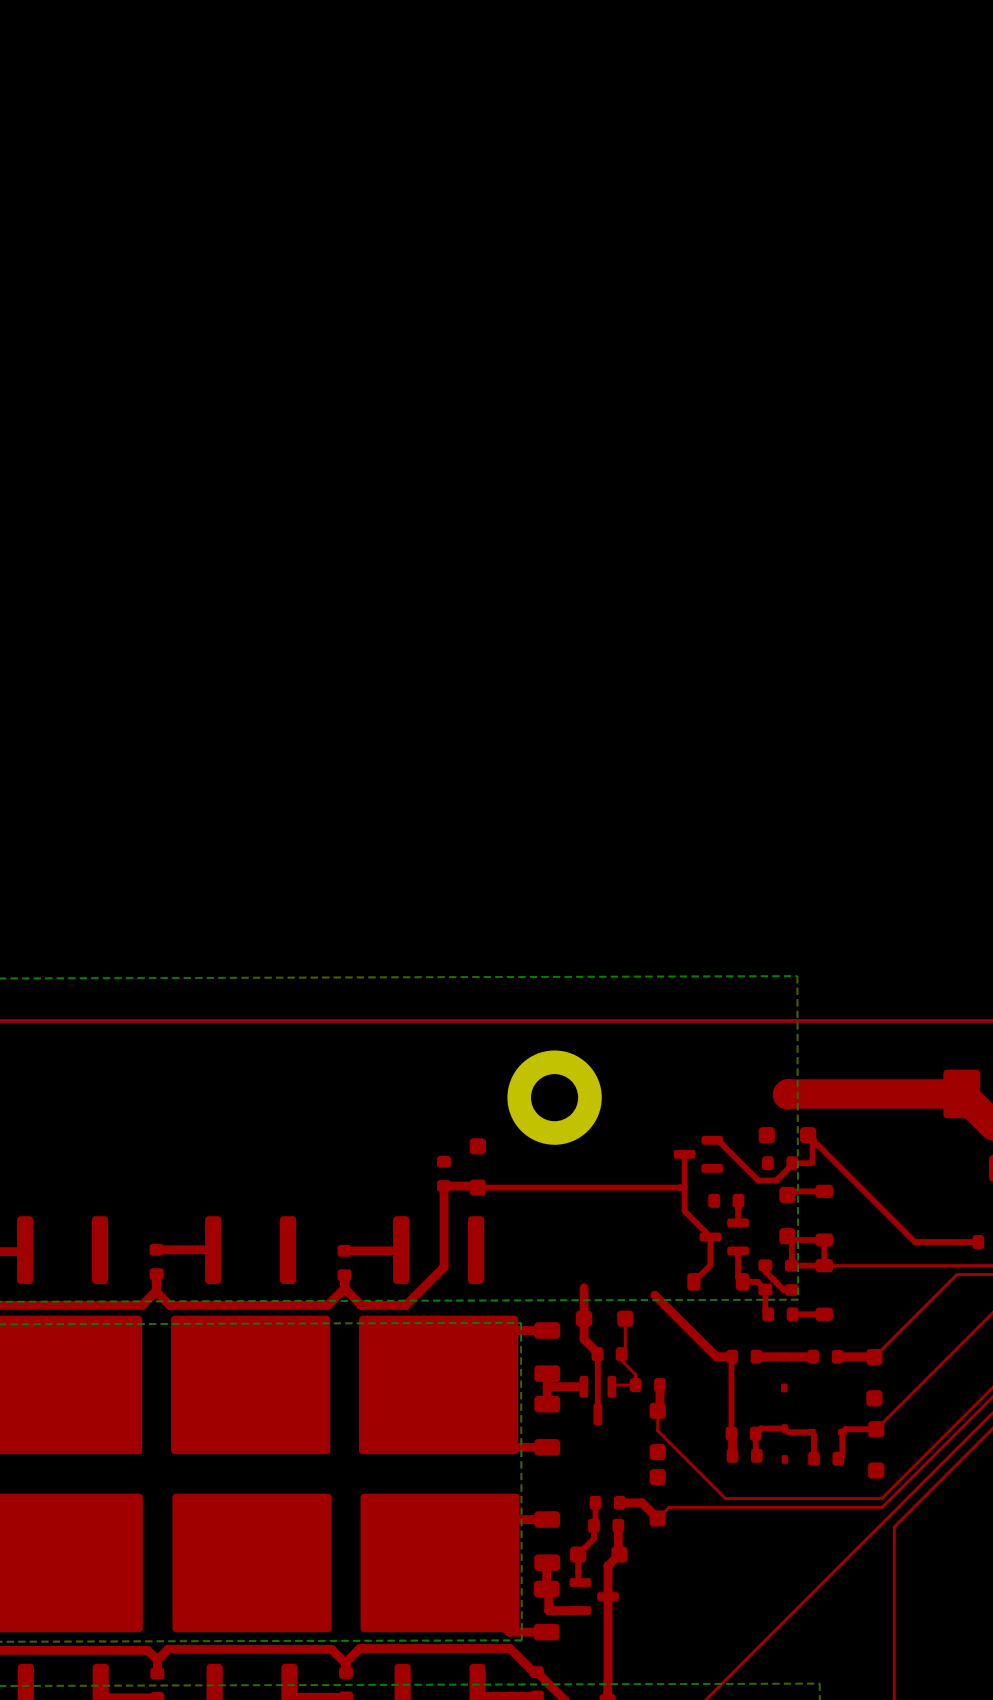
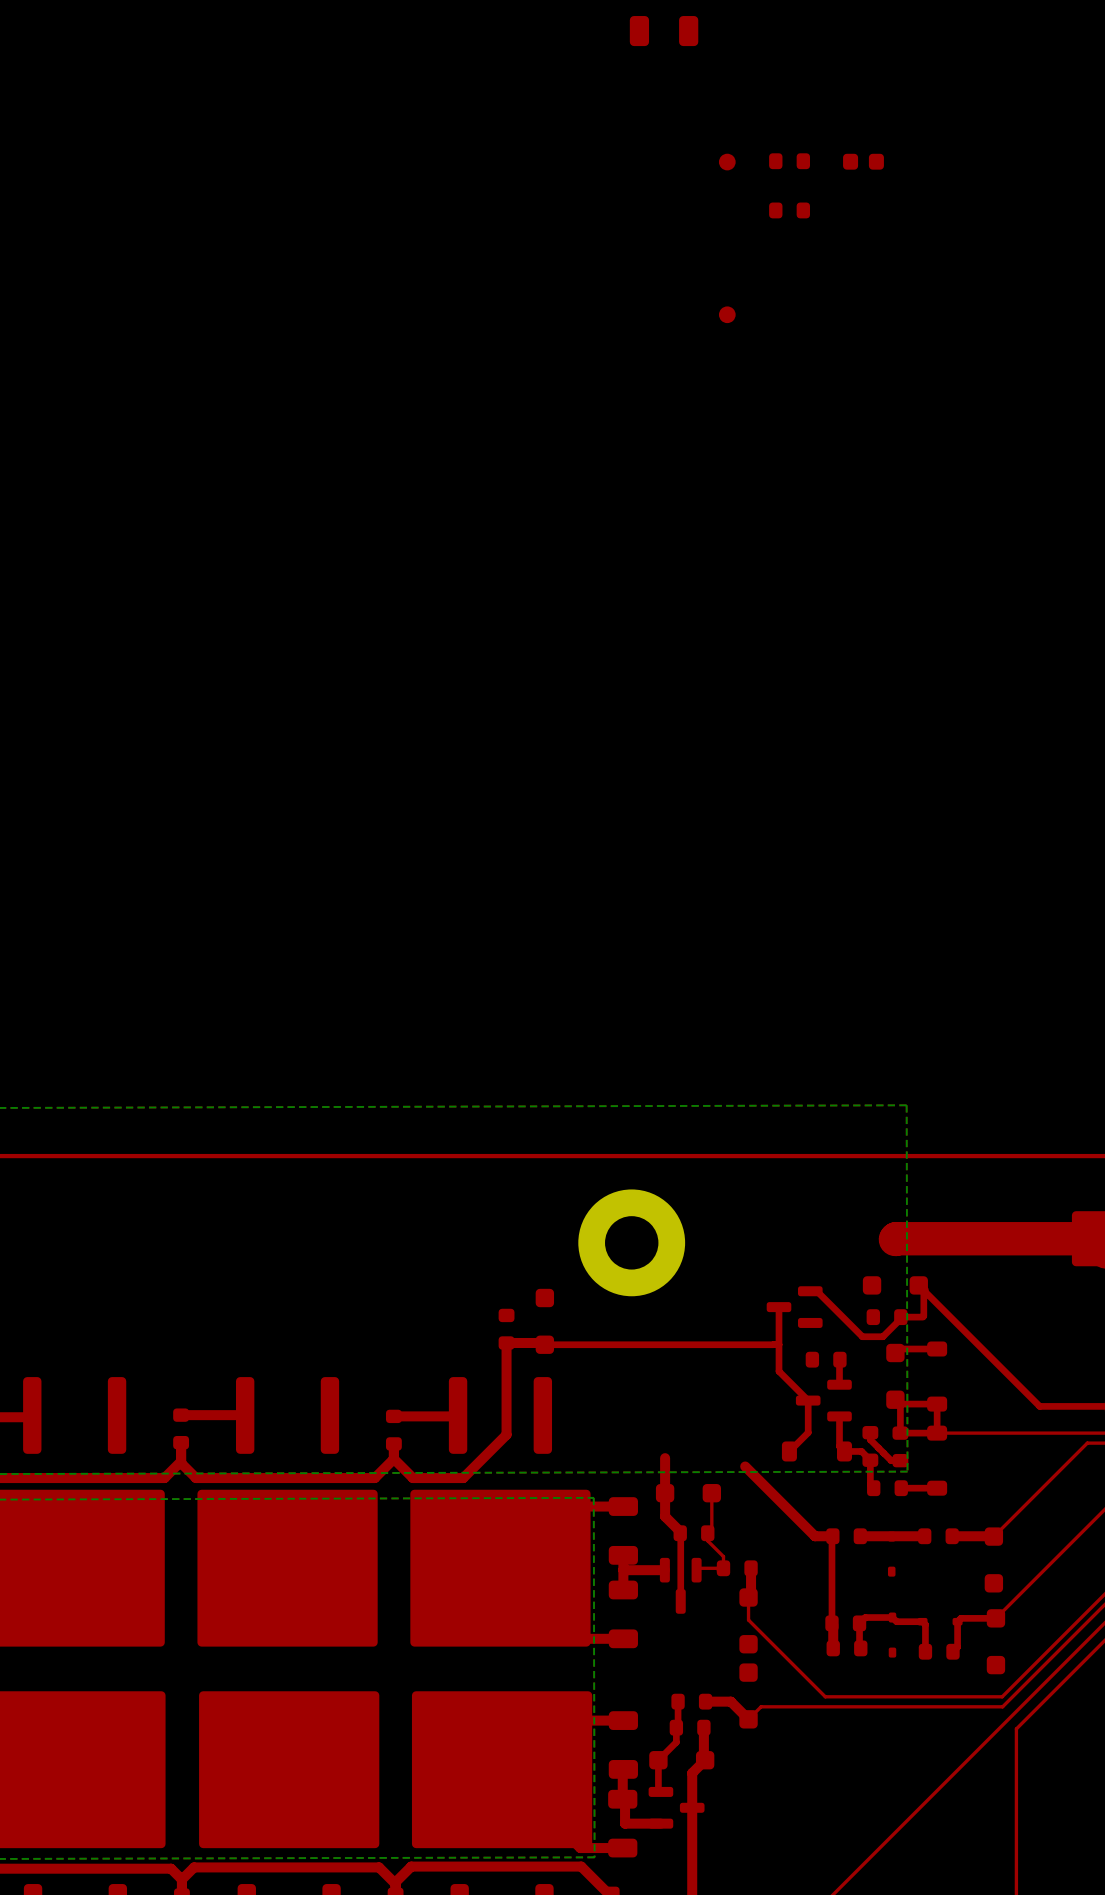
part: none -> (664, 31)
part: none -> (789, 161)
part: none -> (863, 161)
part: none -> (727, 162)
part: none -> (789, 210)
part: none -> (727, 314)

